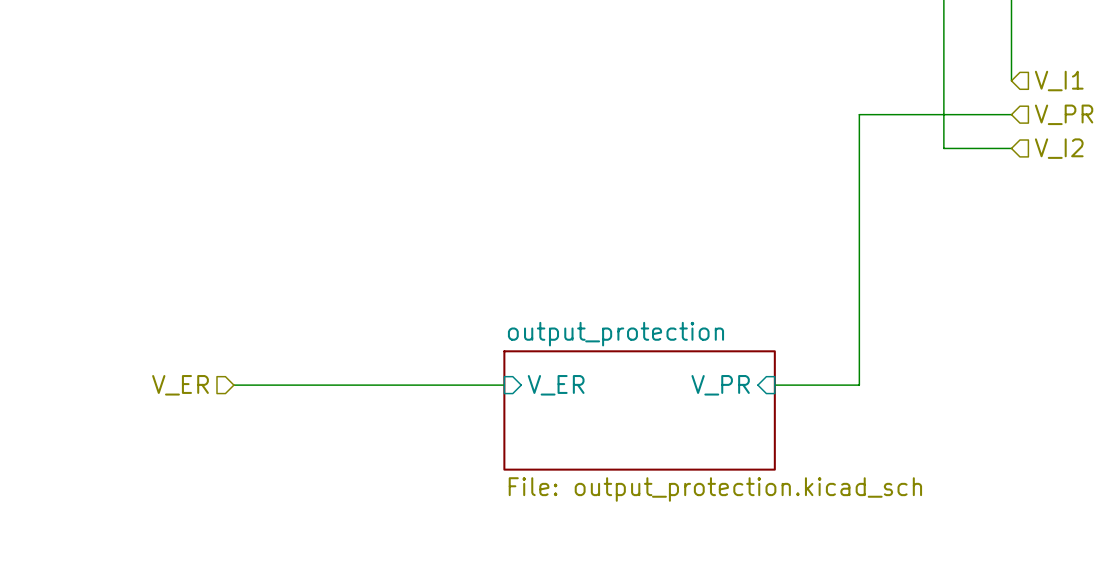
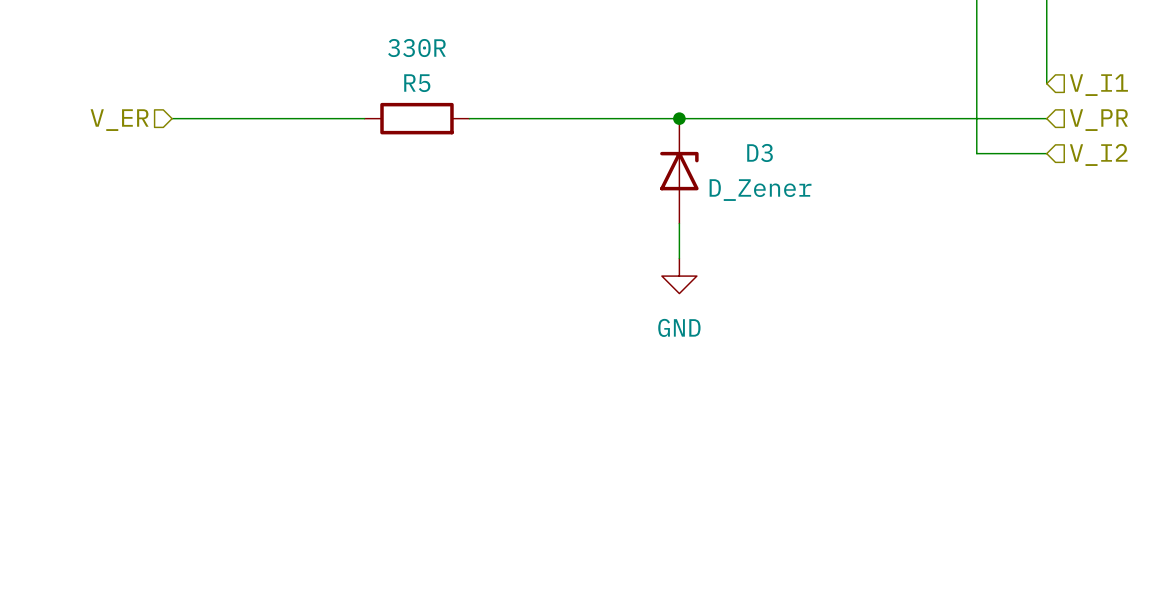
wire: none -> (172, 118) (364, 118)
R5: none -> 330R (416, 118)
junction: none -> (679, 118)
wire: (859, 114) (859, 385) (774, 385) -> (889, 118) (469, 118)
D3: none -> D_Zener (679, 171)
wire: none -> (679, 223) (679, 258)
power symbol: none -> GND (679, 276)
hierarchical label position: V_ER (180, 385) -> V_ER (119, 120)
wire: (233, 385) (504, 385) -> none
sheet pin: V_ER (556, 385) -> none
sheet pin: V_PR (720, 385) -> none
sheet output_protection: File: output_protection.kicad_sch (639, 410) -> none

